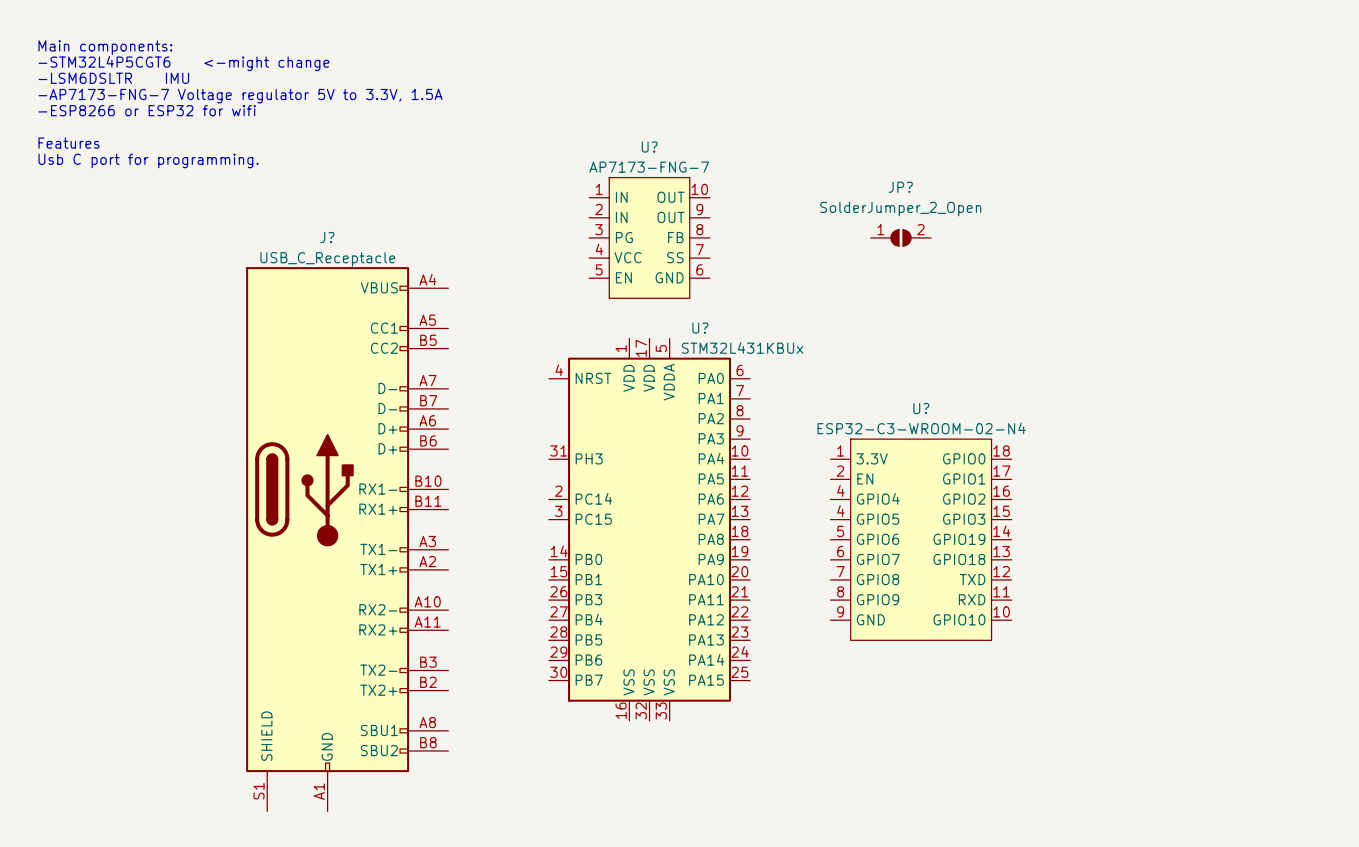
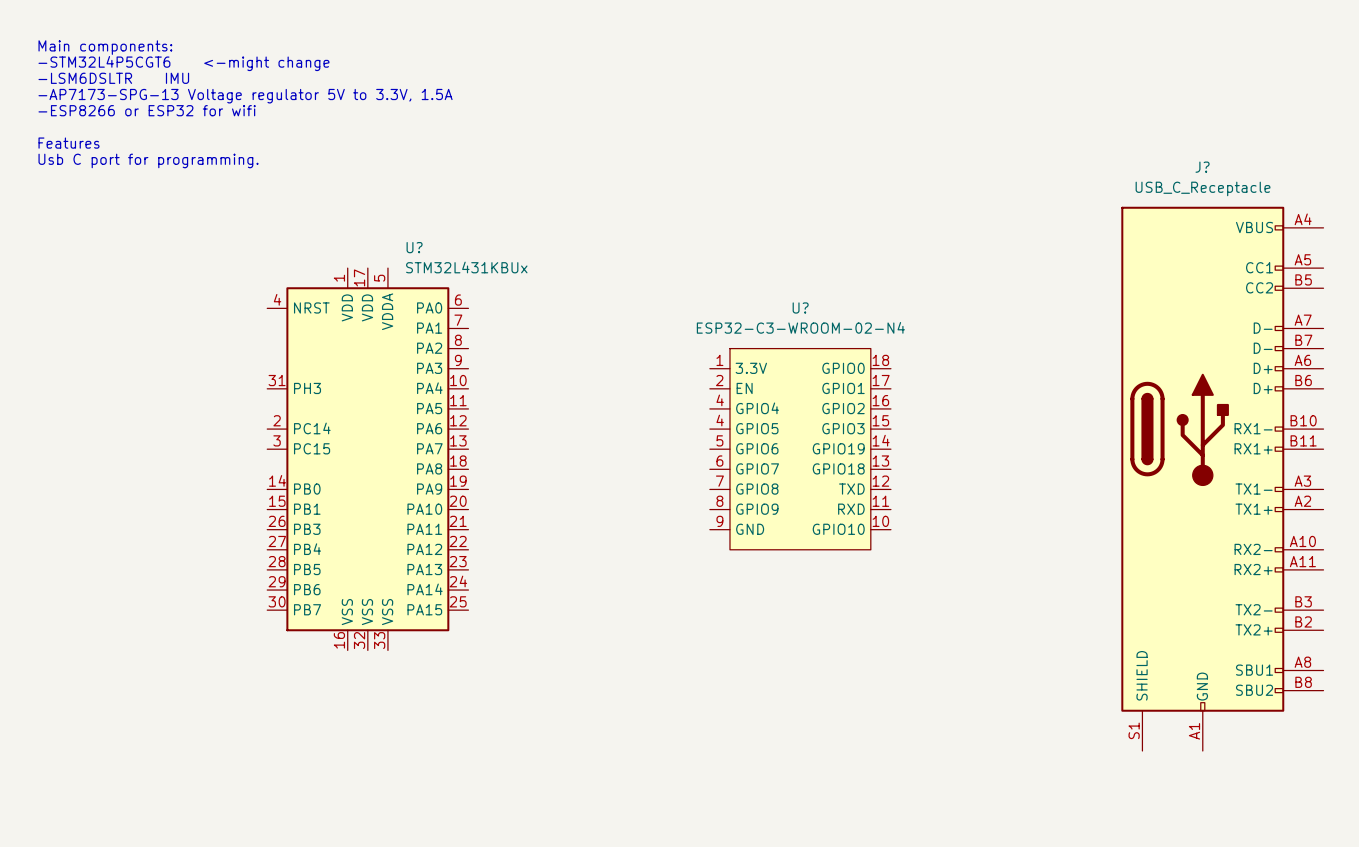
text: -AP7173-FNG-7 Voltage regulator 5V to 3.3V, 1.5A (240, 96) -> -AP7173-SPG-13 Voltage regulator 5V to 3.3V, 1.5A (245, 96)
U?: AP7173-FNG-7 (649, 237) -> none
JP?: SolderJumper_2_Open (900, 237) -> none
U? name position: U? (921, 408) -> U? (800, 307)
U? value position: ESP32-C3-WROOM-02-N4 (921, 428) -> ESP32-C3-WROOM-02-N4 (800, 327)
U?: none -> STM32L431KBUx (367, 459)
J?: none -> USB_C_Receptacle (1222, 478)
U?: STM32L431KBUx (649, 529) -> none
J?: USB_C_Receptacle (347, 539) -> none
U? position: (921, 539) -> (800, 449)

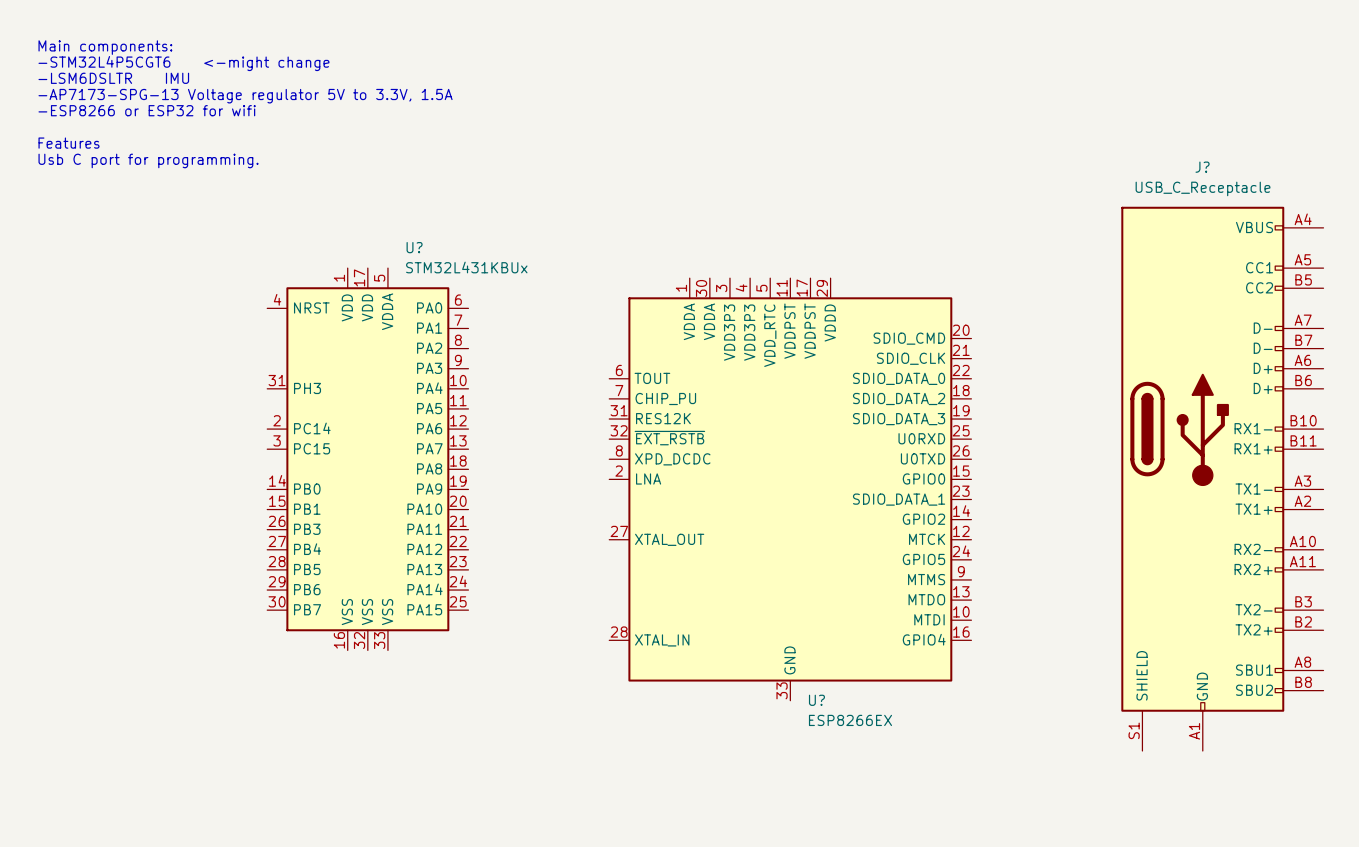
U?: ESP32-C3-WROOM-02-N4 (800, 449) -> none
U?: none -> ESP8266EX (790, 489)

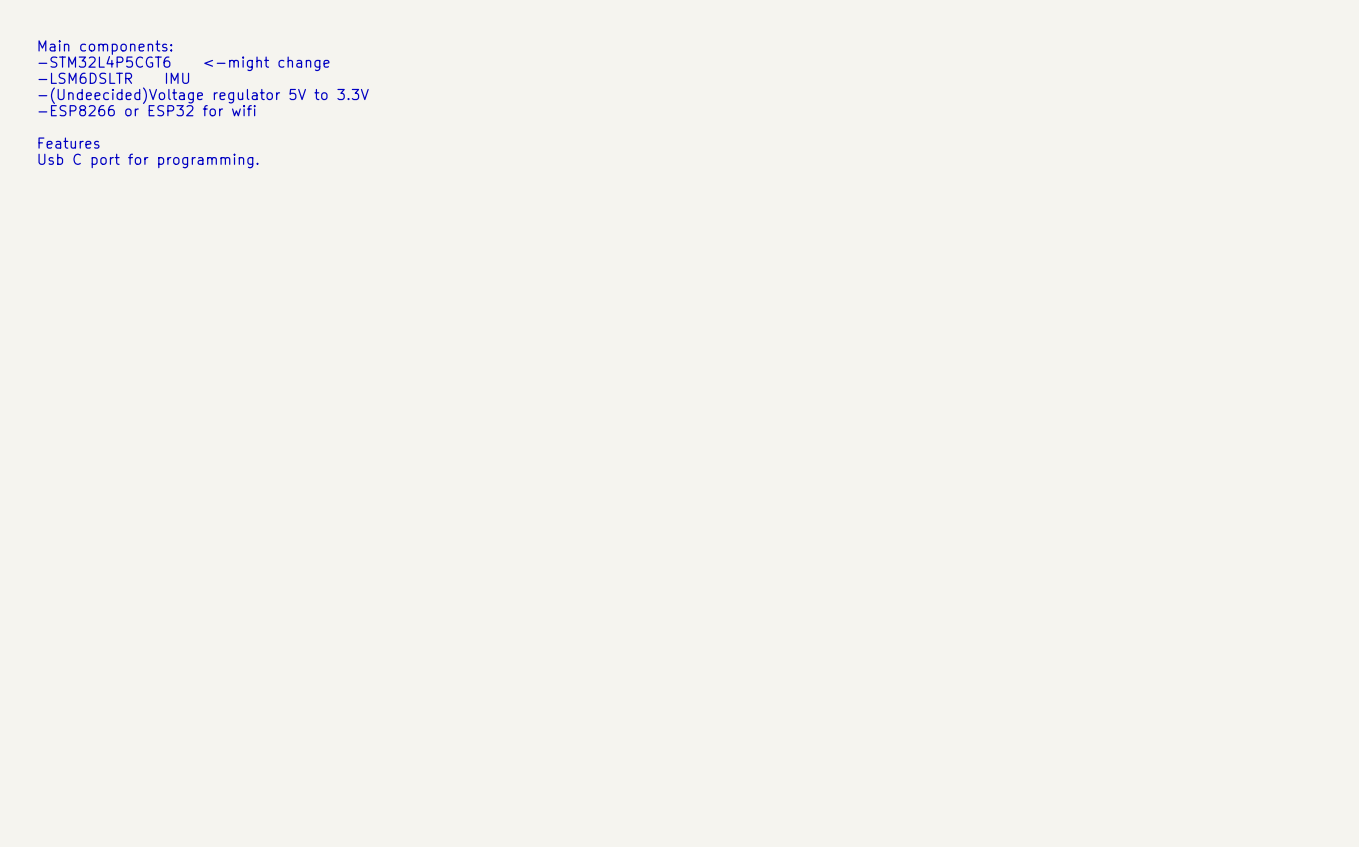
text: -AP7173-SPG-13 Voltage regulator 5V to 3.3V, 1.5A (245, 96) -> -(Undeecided)Voltage regulator 5V to 3.3V (203, 95)
U?: STM32L431KBUx (367, 459) -> none
J?: USB_C_Receptacle (1222, 478) -> none
U?: ESP8266EX (790, 489) -> none

